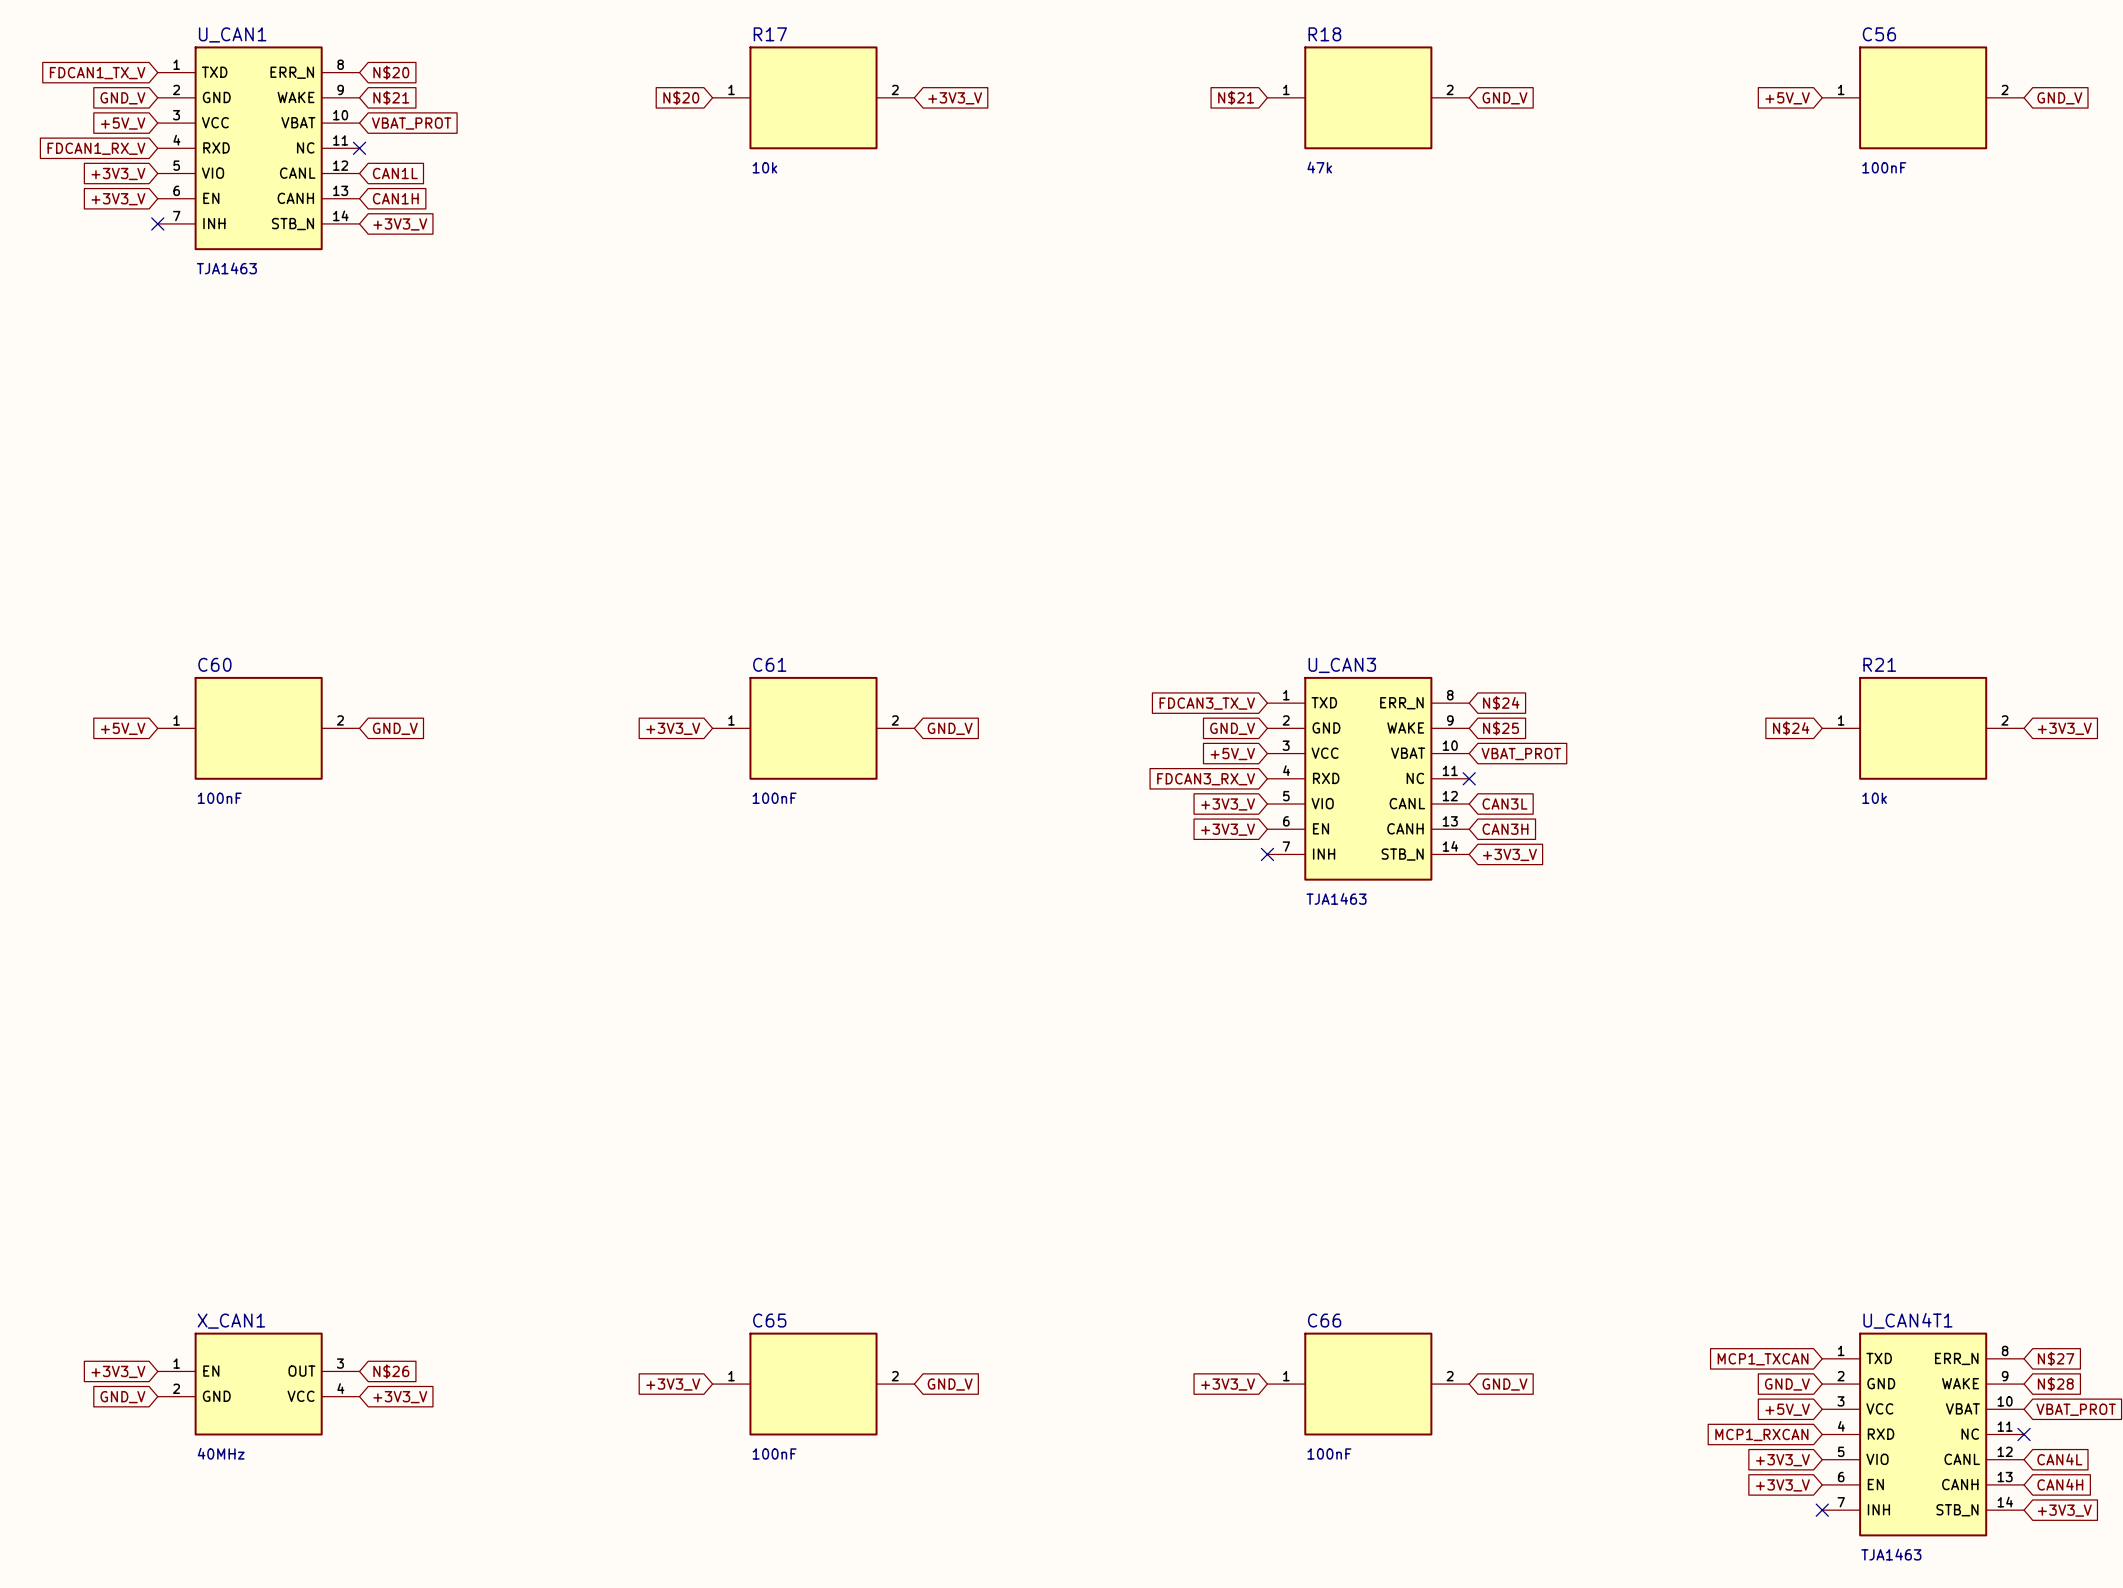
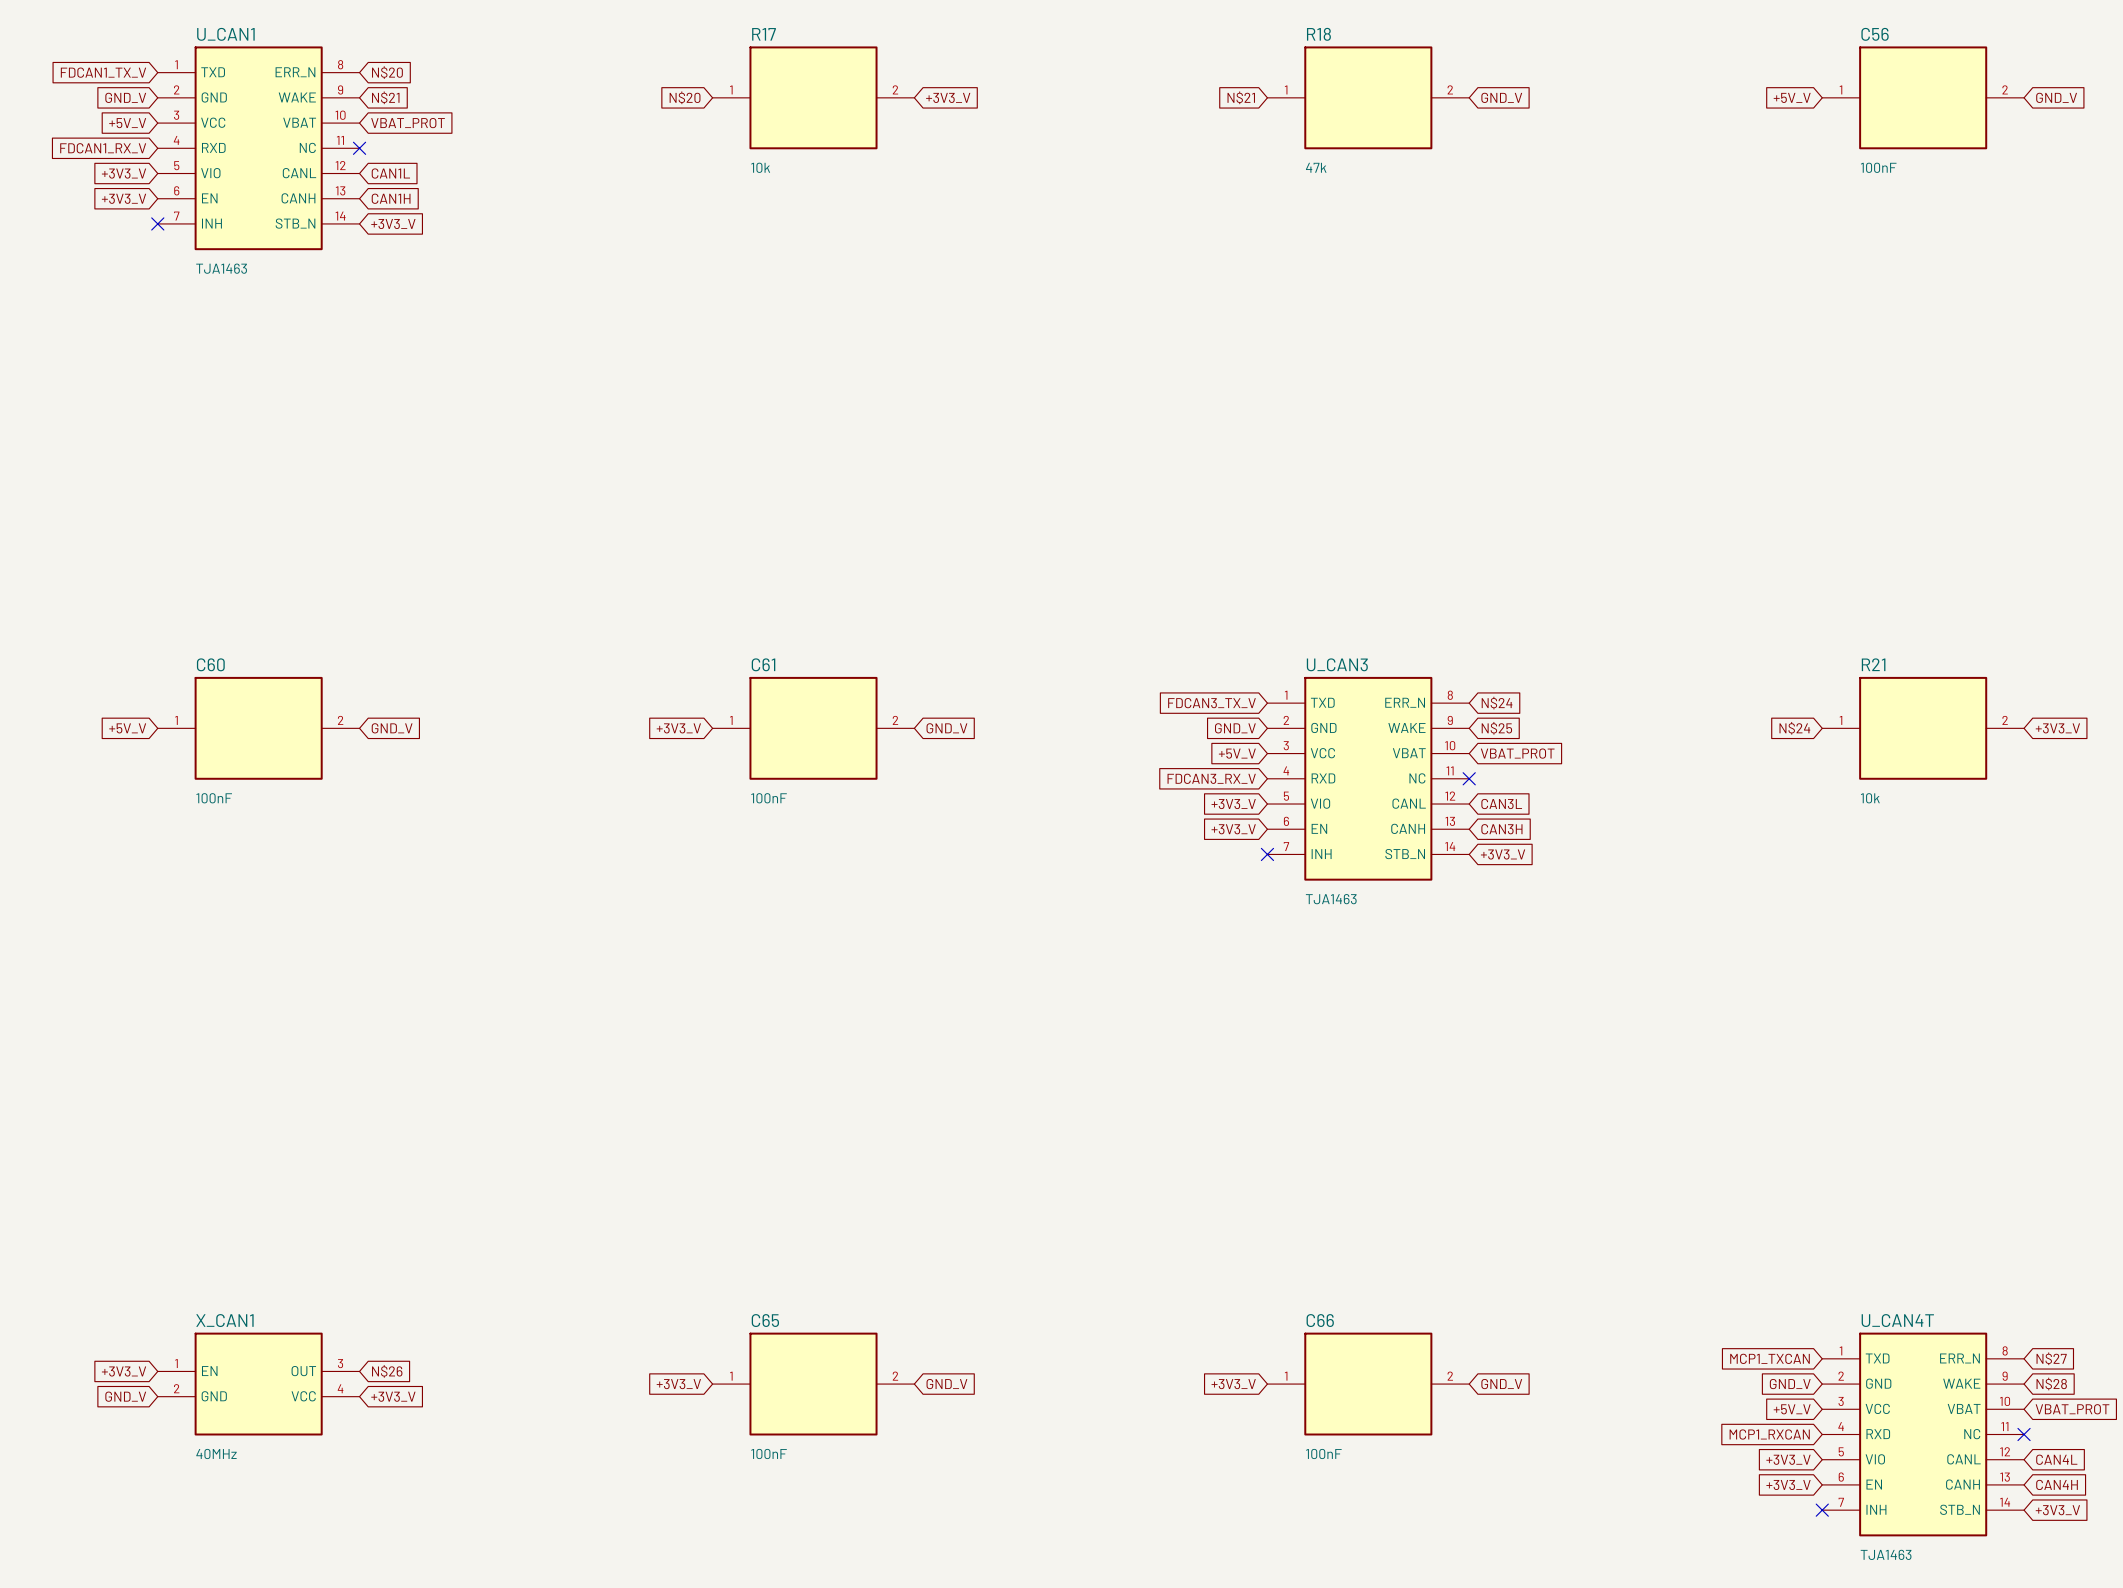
U_CAN4T1 name: U_CAN4T1 (1907, 1320) -> U_CAN4T (1897, 1320)

